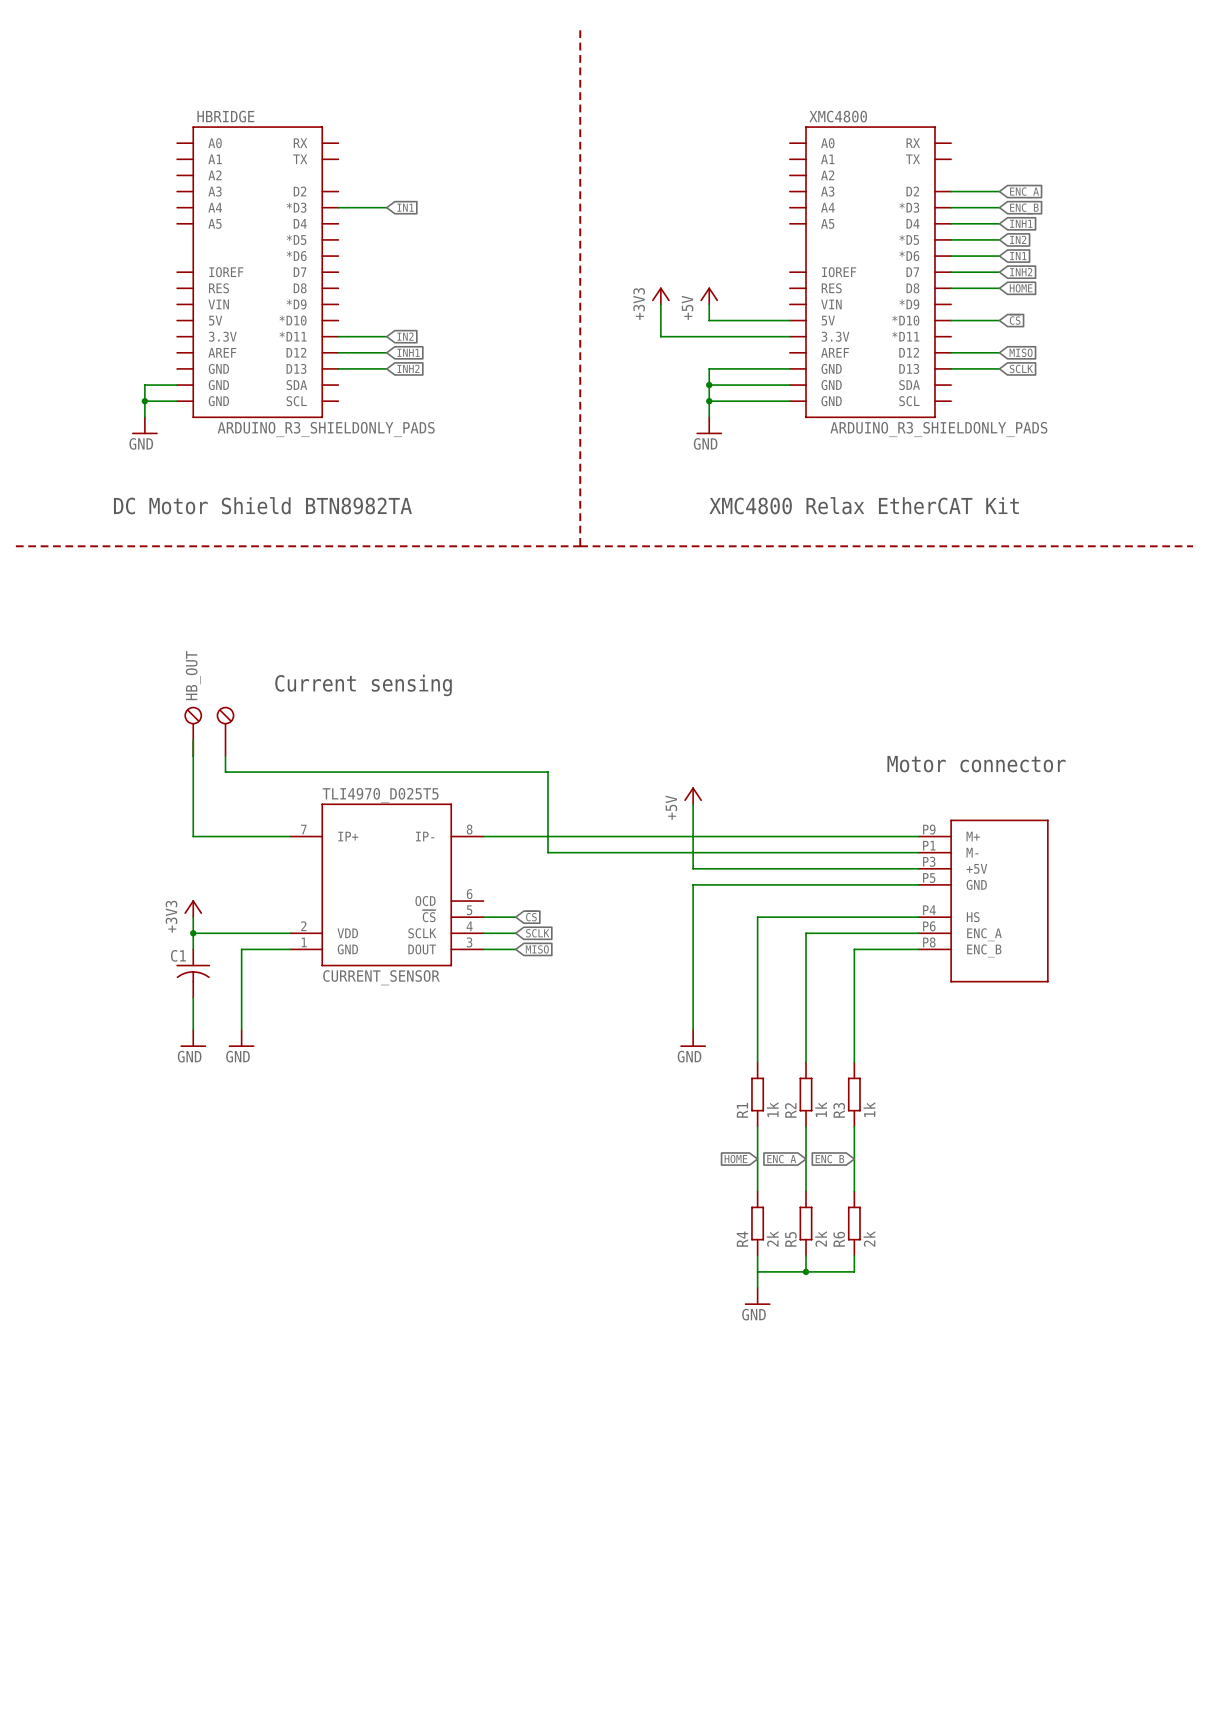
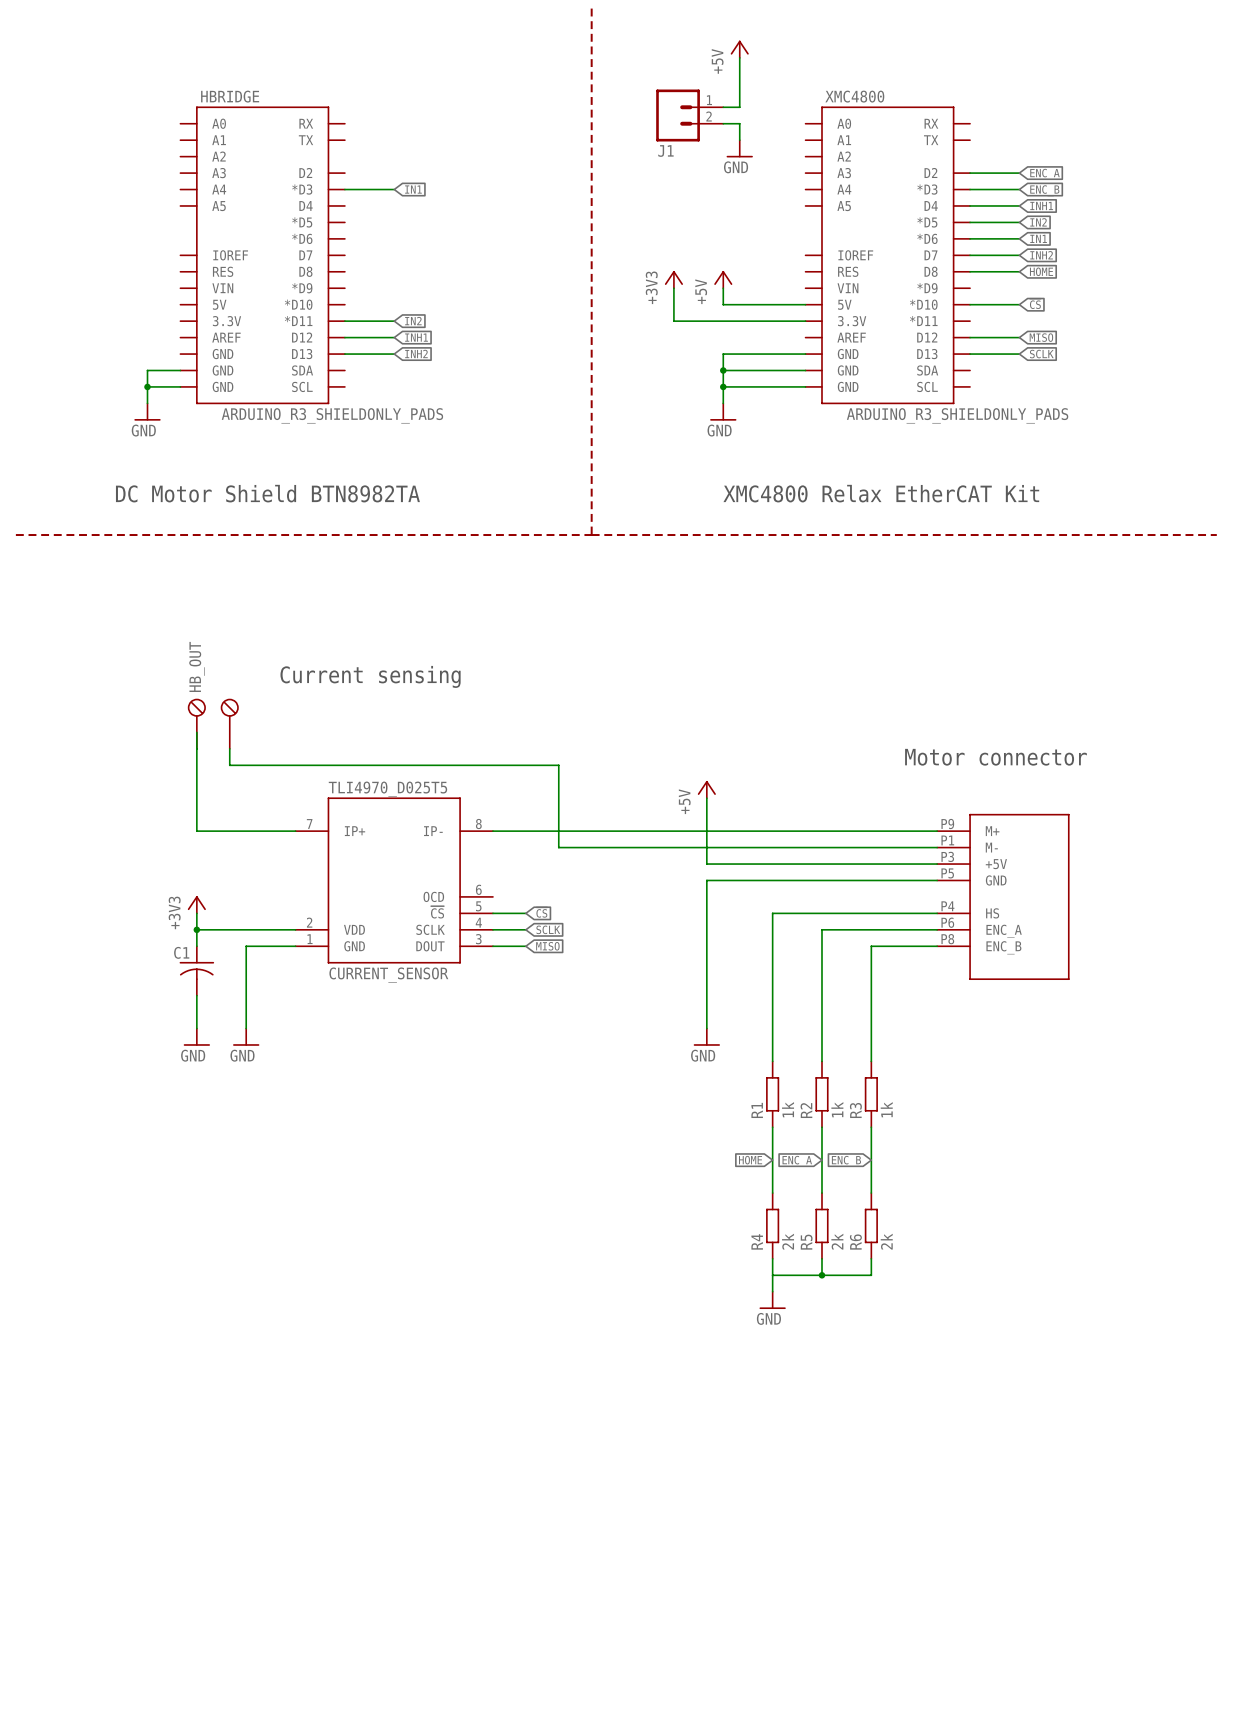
power symbol: none -> +5V (739, 49)
wire: none -> (739, 57) (739, 107) (723, 107)
J1: none -> (689, 115)
wire: none -> (723, 123) (739, 123) (739, 140)
power symbol: none -> GND (739, 148)

